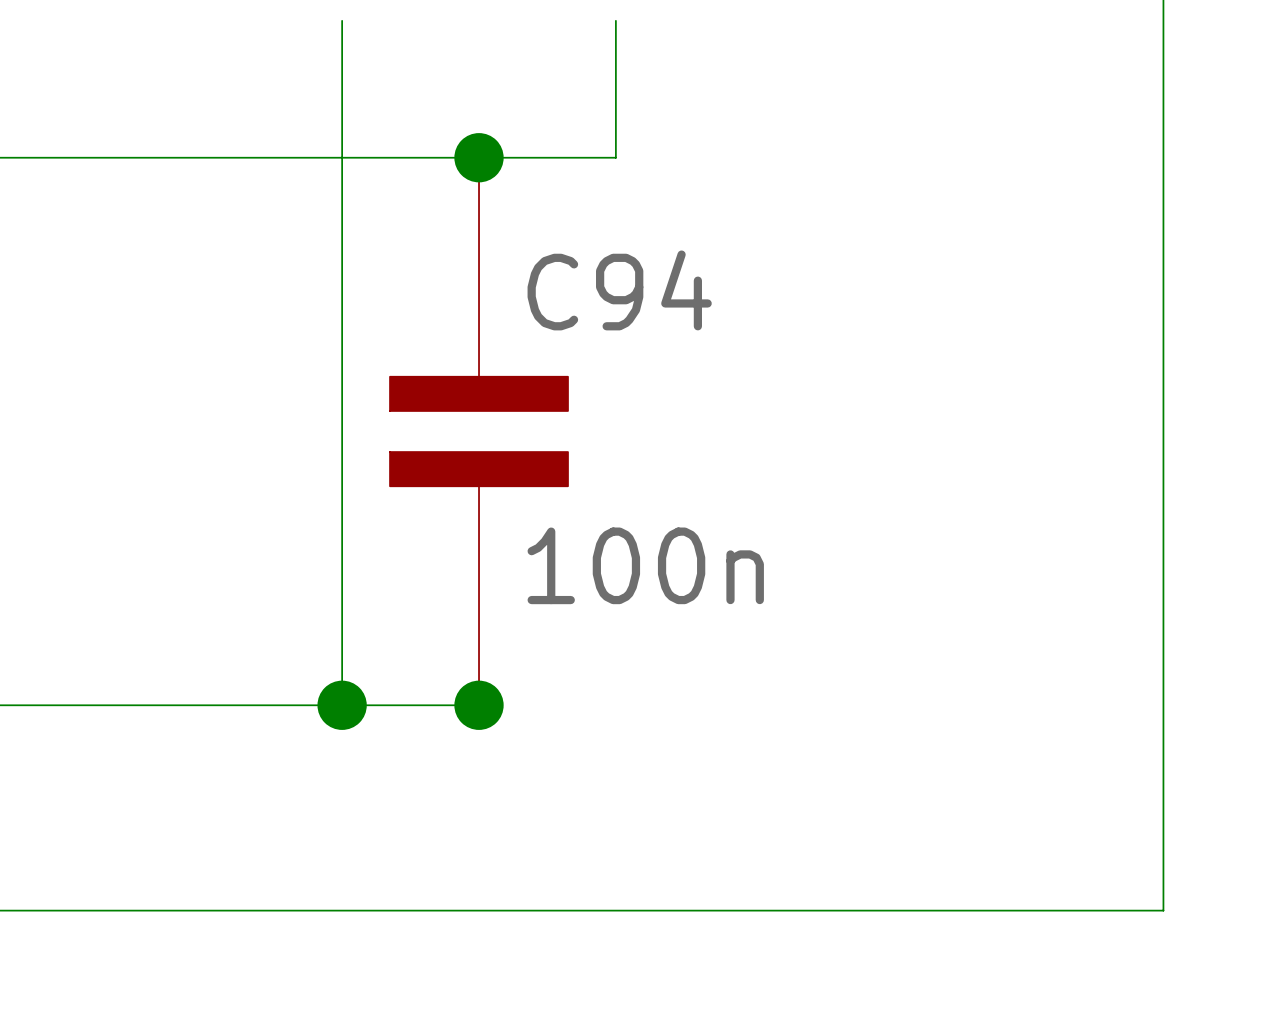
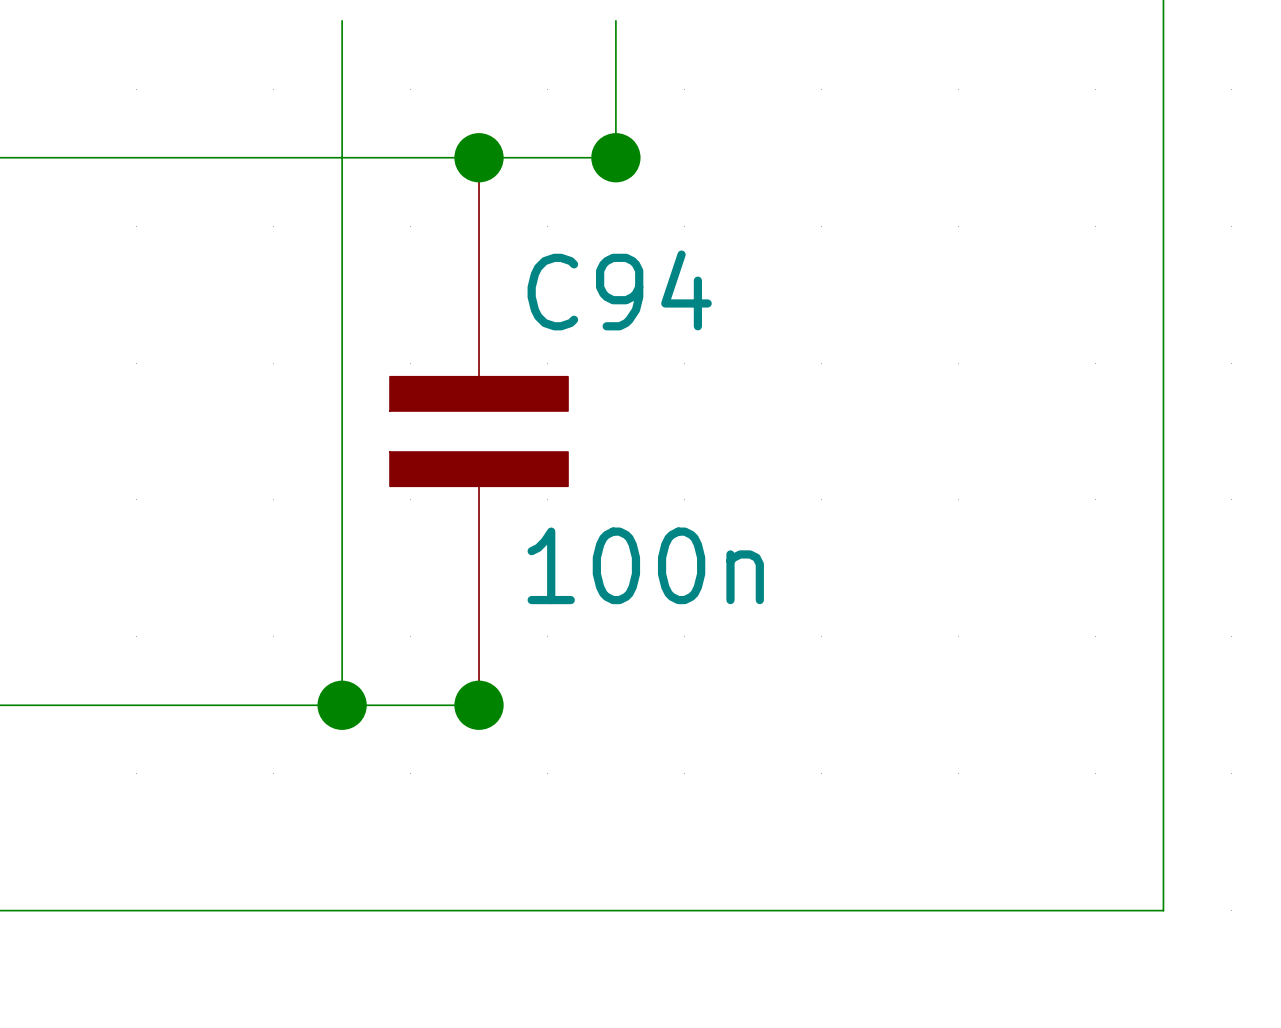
junction: none -> (615, 157)

